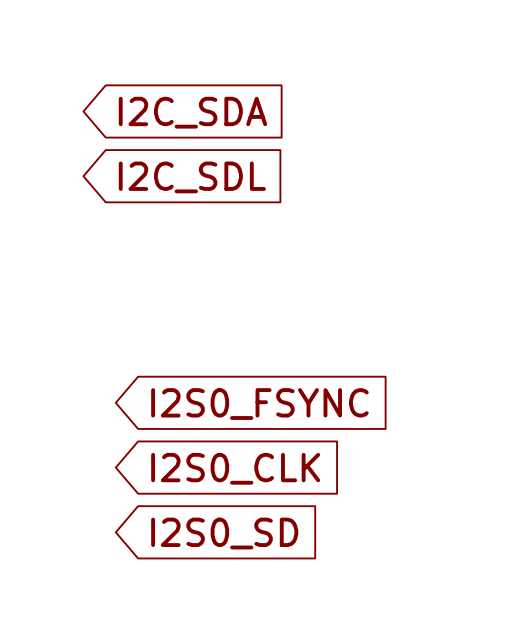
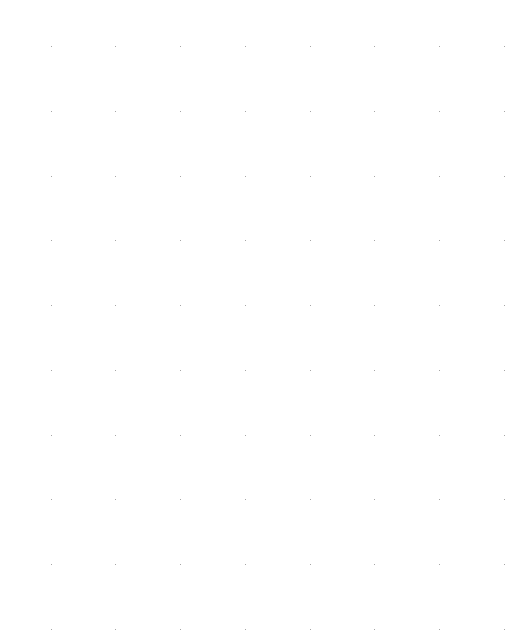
global label: I2C_SDA (192, 112) -> none
global label: I2C_SDL (192, 177) -> none
global label: I2S0_FSYNC (259, 404) -> none
global label: I2S0_CLK (235, 468) -> none
global label: I2S0_SD (224, 533) -> none

